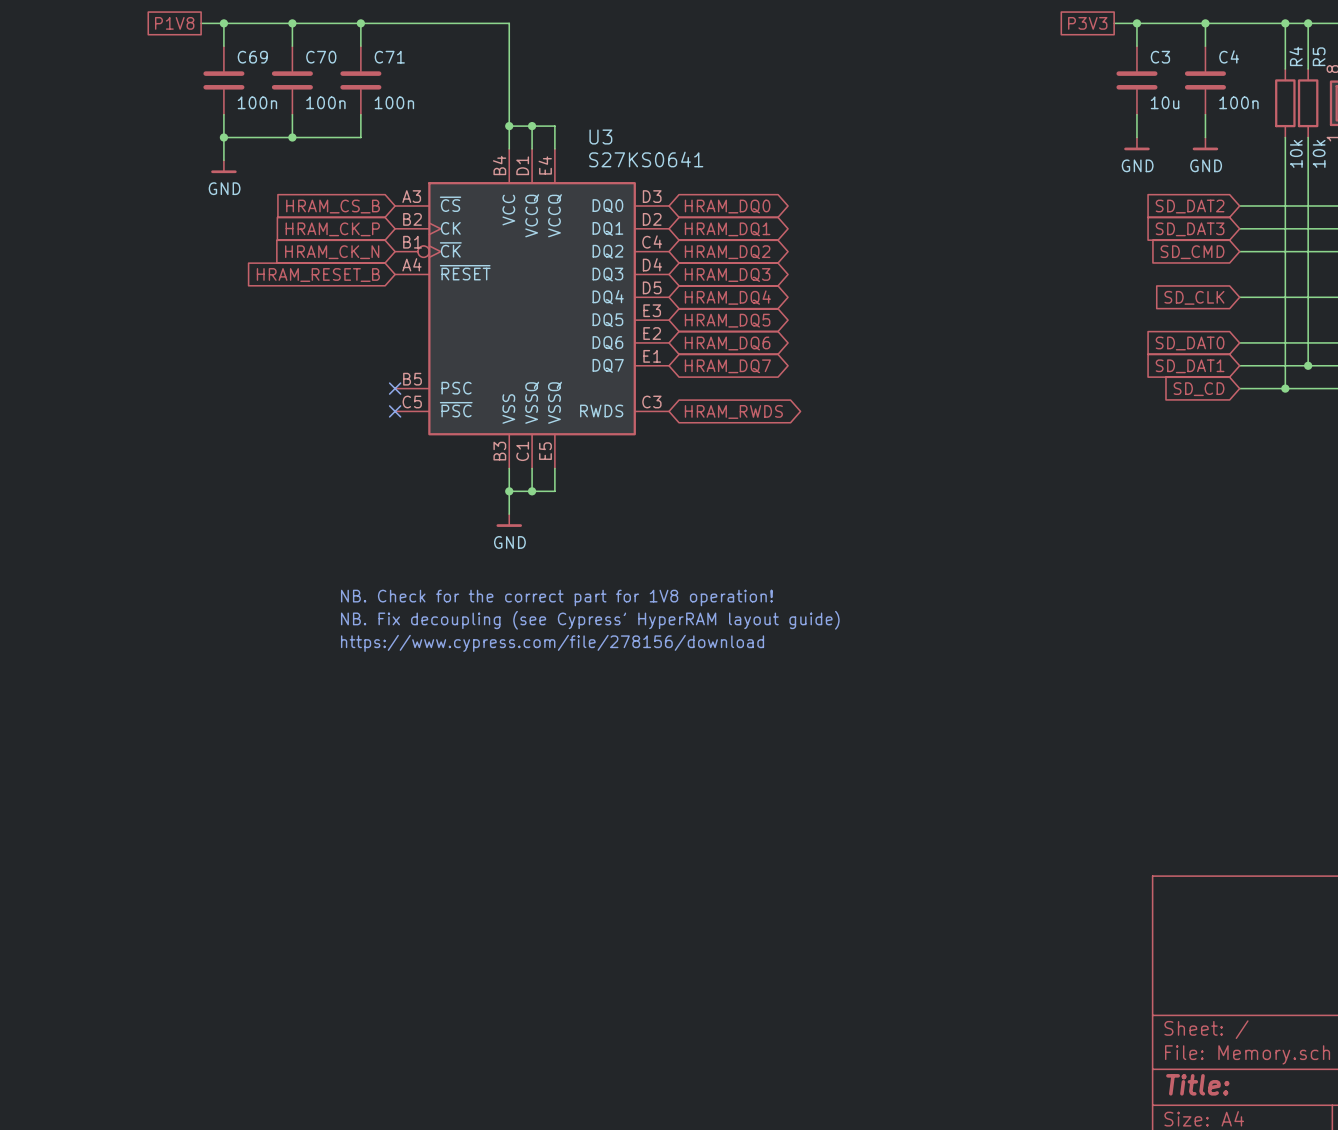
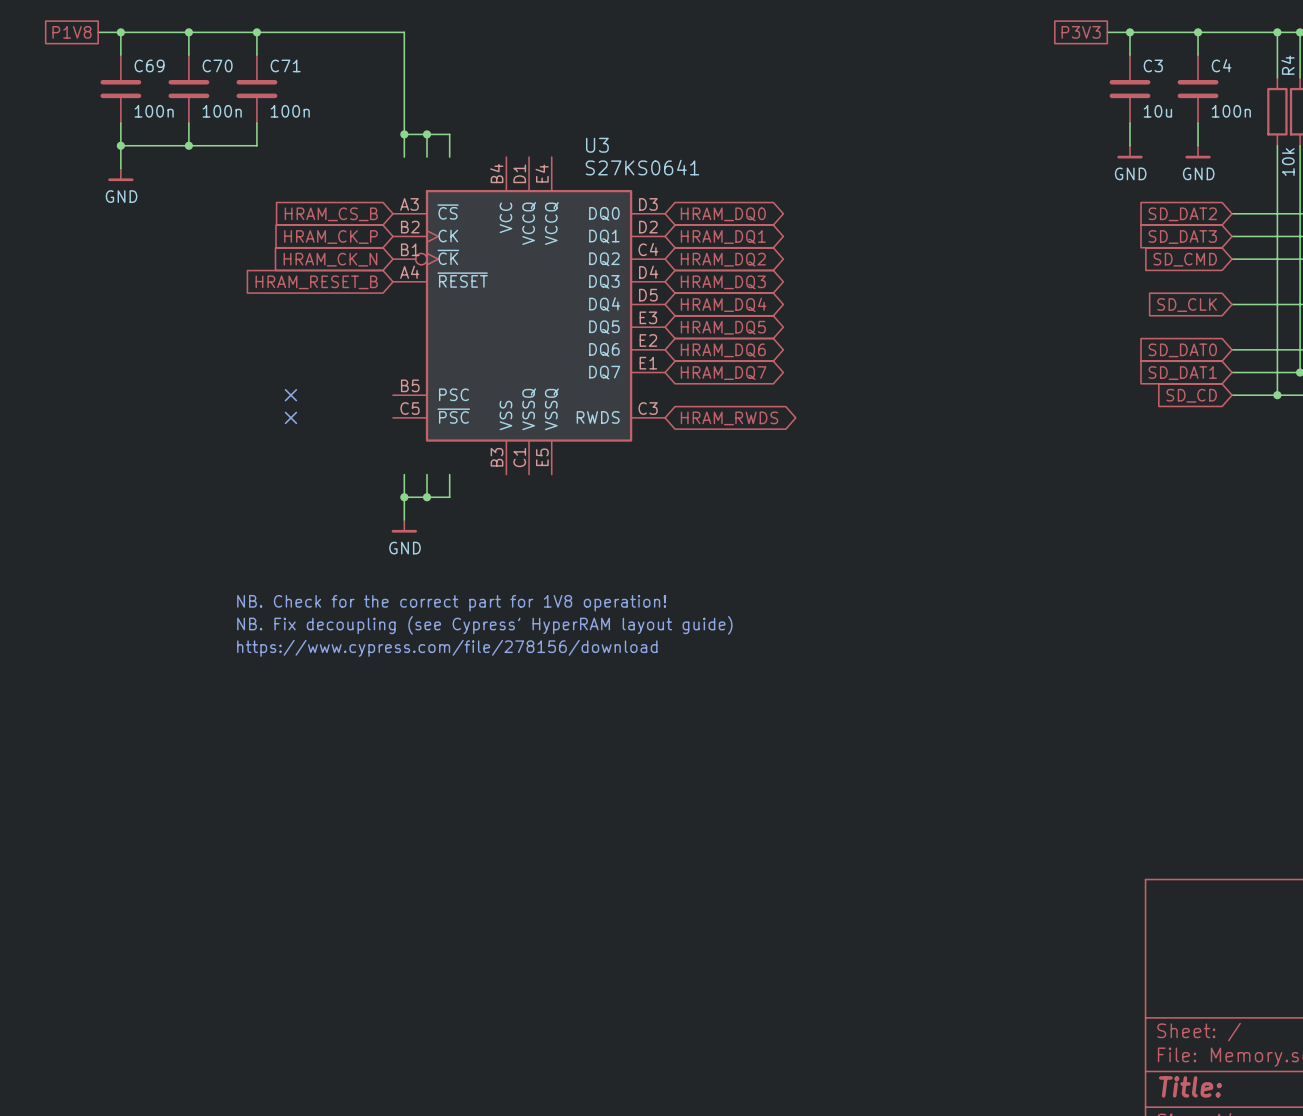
wire: none -> (98, 32) (200, 32)
junction: none -> (120, 32)
global label position: P1V8 (174, 23) -> P1V8 (71, 32)
junction: none -> (188, 32)
wire: (223, 23) (223, 46) -> (120, 32) (120, 55)
junction: (223, 23) -> none
junction: none -> (256, 32)
wire: (292, 23) (292, 46) -> (188, 32) (188, 55)
junction: (292, 23) -> none
wire: (360, 23) (360, 46) -> (256, 32) (256, 55)
junction: (360, 23) -> none
wire: (406, 23) (509, 23) (509, 148) -> (404, 32) (404, 157)
C69 position: (223, 80) -> (120, 89)
C70 position: (292, 80) -> (188, 89)
C71 position: (360, 80) -> (256, 89)
wire: (223, 114) (223, 160) -> (120, 123) (120, 168)
wire: (292, 114) (292, 137) -> (188, 123) (188, 145)
wire: (360, 114) (360, 137) (258, 137) -> (256, 123) (256, 145)
junction: none -> (404, 134)
junction: none -> (427, 134)
wire: (509, 126) (554, 126) (554, 148) -> (404, 134) (449, 134) (449, 157)
junction: (509, 126) -> none
wire: (532, 126) (532, 148) -> (427, 134) (427, 157)
junction: (532, 126) -> none
wire: none -> (120, 145) (222, 145)
junction: none -> (120, 145)
junction position: (223, 137) -> (188, 145)
junction: (292, 137) -> none
power symbol position: GND (223, 166) -> GND (120, 174)
no-connect mark: none -> (290, 395)
no-connect mark: (395, 388) -> none
no-connect mark: none -> (290, 417)
no-connect mark: (395, 411) -> none
wire: (509, 468) (509, 514) -> (404, 474) (404, 519)
wire: (532, 468) (532, 491) -> (427, 474) (427, 497)
wire: (554, 468) (554, 491) (509, 491) -> (449, 474) (449, 497) (404, 497)
junction: none -> (404, 497)
junction: none -> (427, 497)
junction: (509, 491) -> none
junction: (532, 491) -> none
power symbol position: GND (509, 520) -> GND (404, 526)
text position: NB. Check for the correct part for 1V8 operation! (556, 598) -> NB. Check for the correct part for 1V8 operation! (451, 603)
text position: NB. Fix decoupling (see Cypress’ HyperRAM layout guide) (590, 620) -> NB. Fix decoupling (see Cypress’ HyperRAM layout guide) (484, 625)
text position: https://www.cypress.com/file/278156/download (552, 643) -> https://www.cypress.com/file/278156/download (447, 648)

